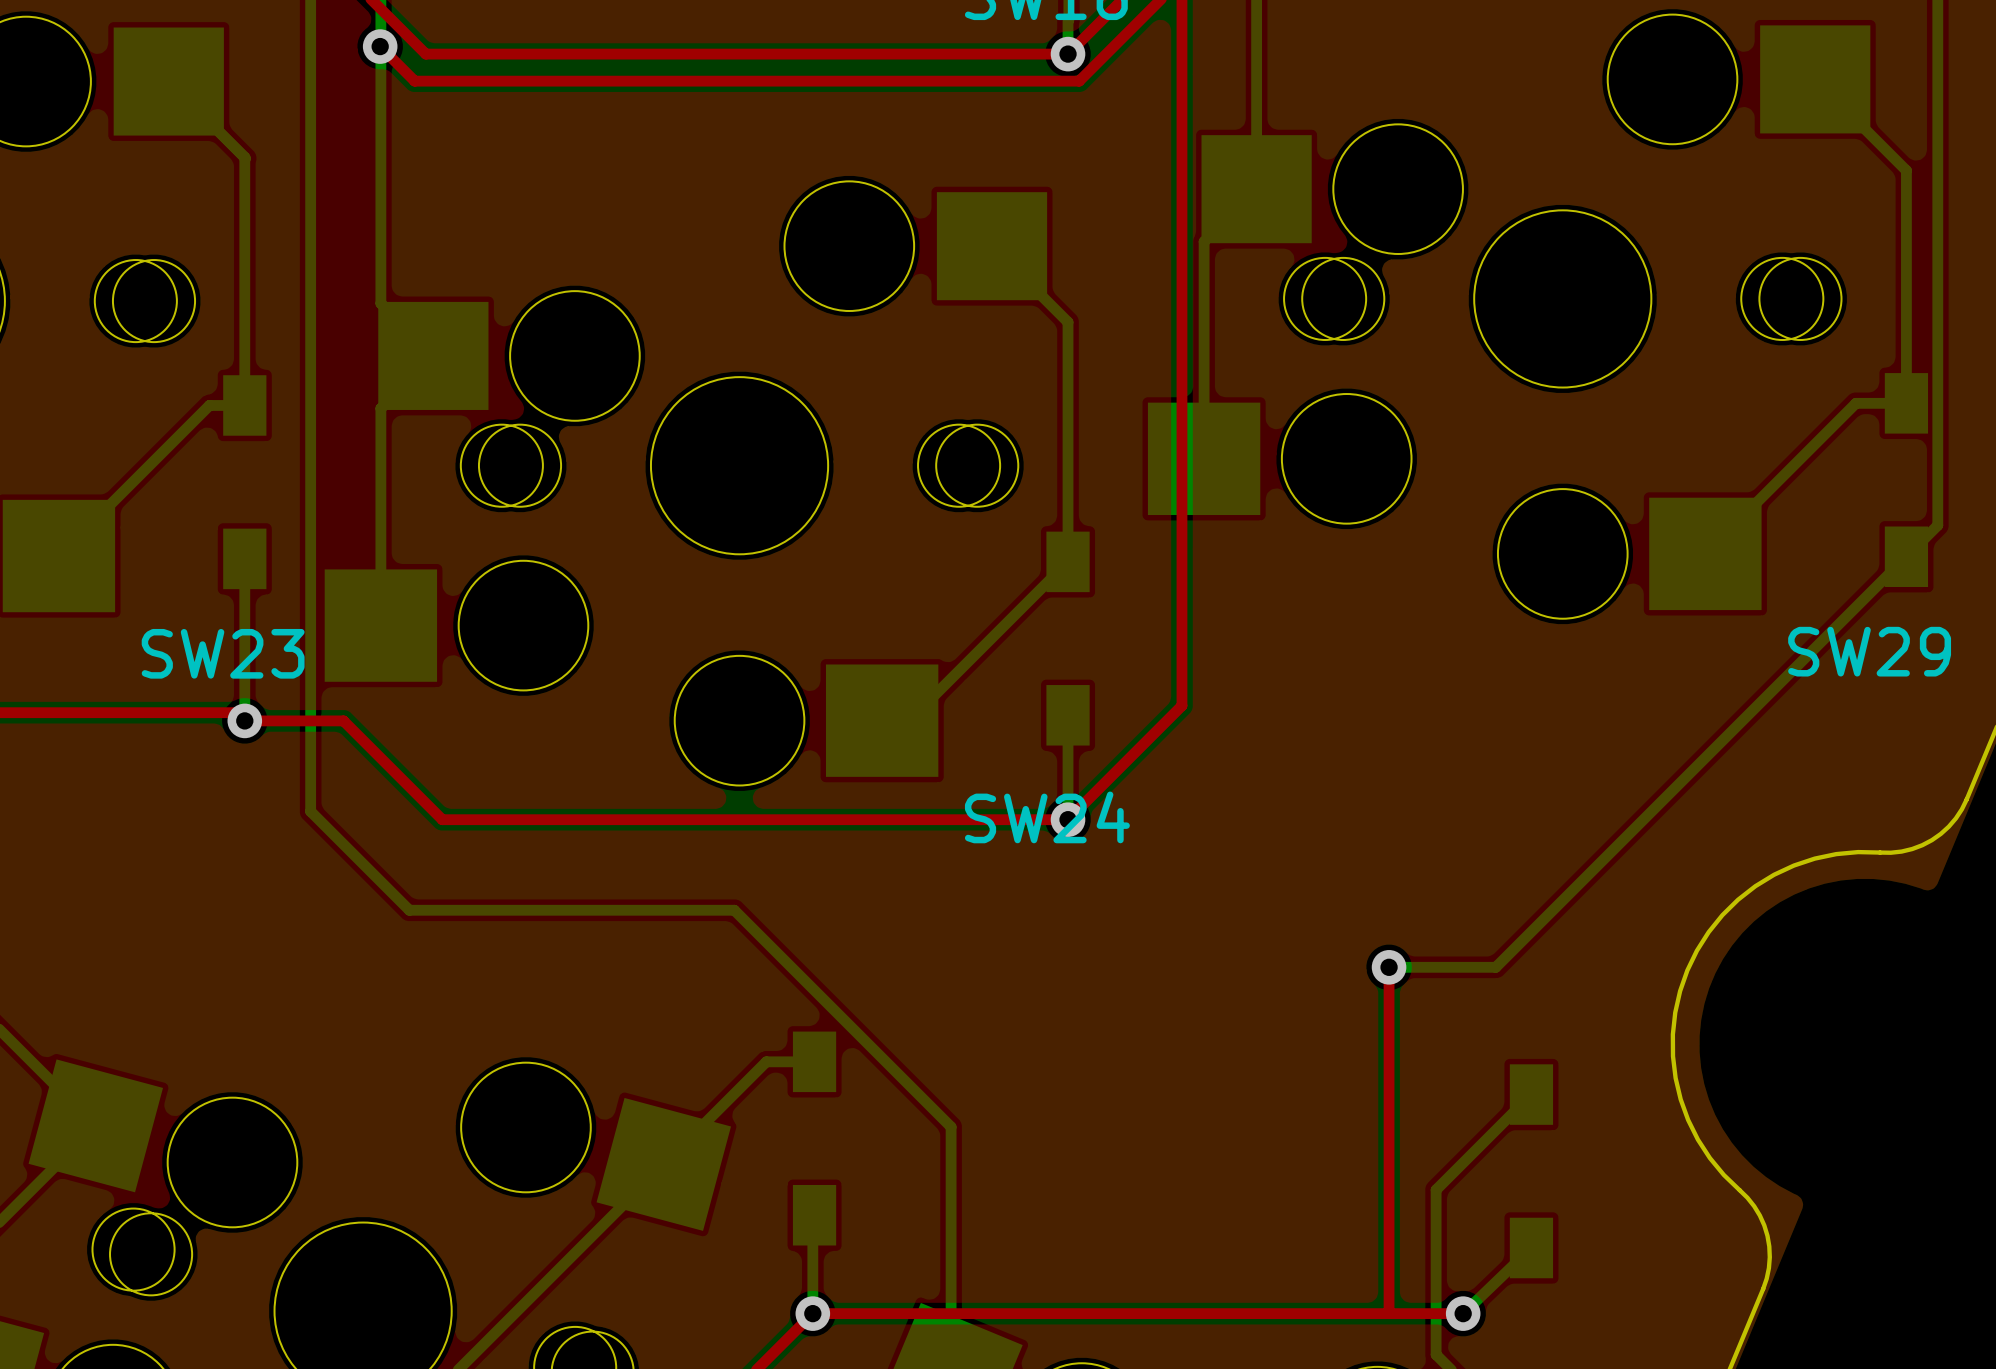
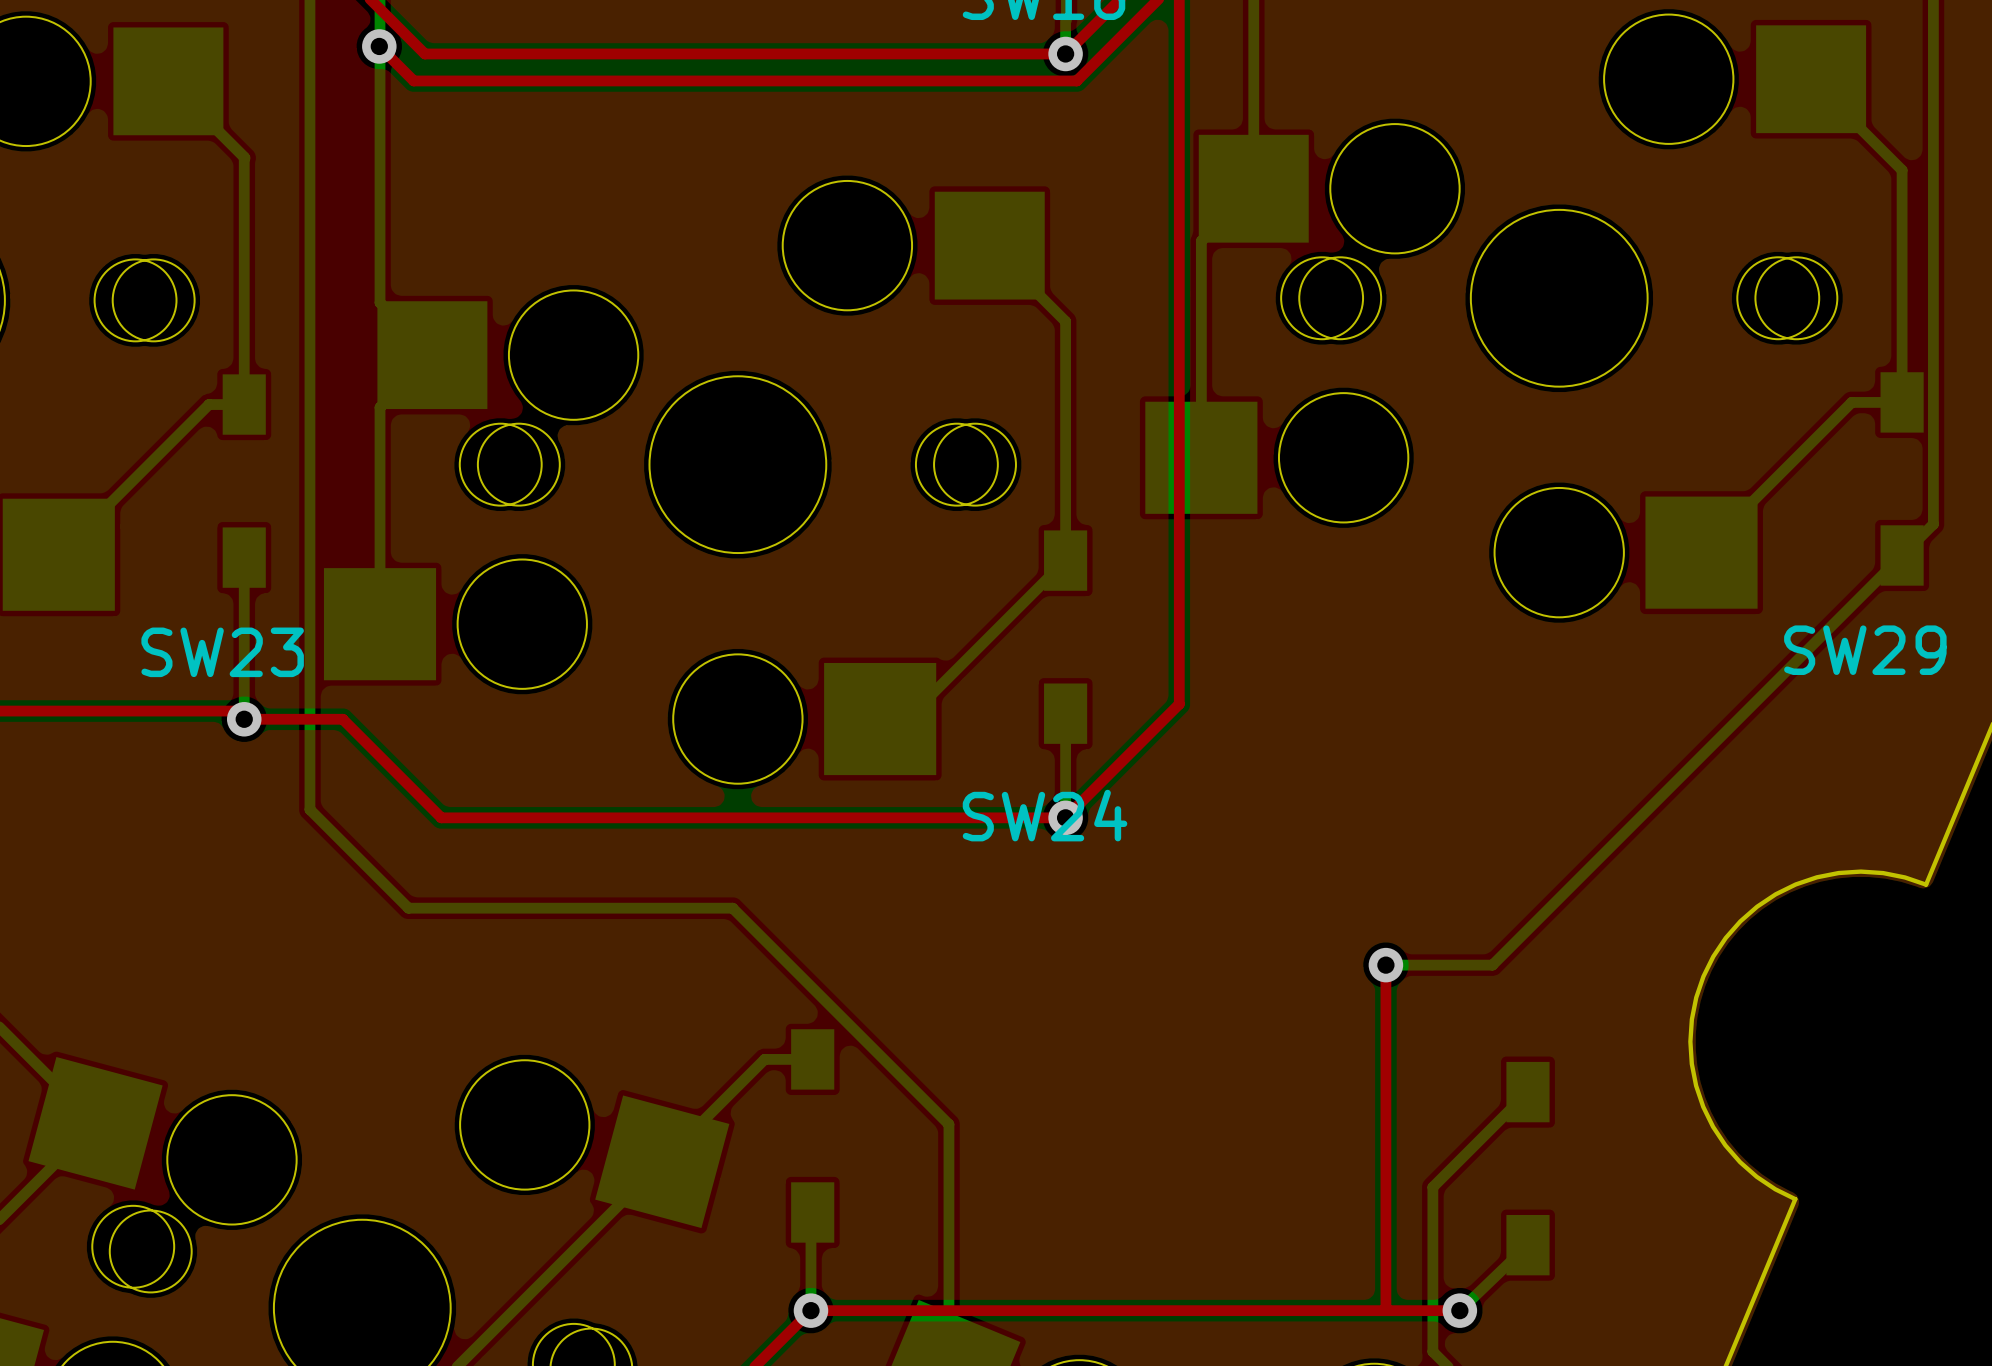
board edge: (1966, 799) (1948, 826) (1922, 845) (1890, 852) (1836, 854) (1814, 858) (1774, 874) (1755, 886) (1722, 915) (1696, 950) (1687, 970) (1675, 1012) (1672, 1034) (1675, 1078) (1680, 1099) (1688, 1120) (1709, 1158) (1747, 1197) (1764, 1225) (1769, 1257) (1763, 1288) -> (1962, 797) (1926, 884) (1883, 873) (1860, 871) (1838, 873) (1795, 884) (1757, 906) (1740, 921) (1725, 938) (1703, 976) (1691, 1019) (1690, 1041) (1691, 1063) (1703, 1106) (1725, 1145) (1740, 1162) (1775, 1189) (1795, 1199) (1759, 1286)

